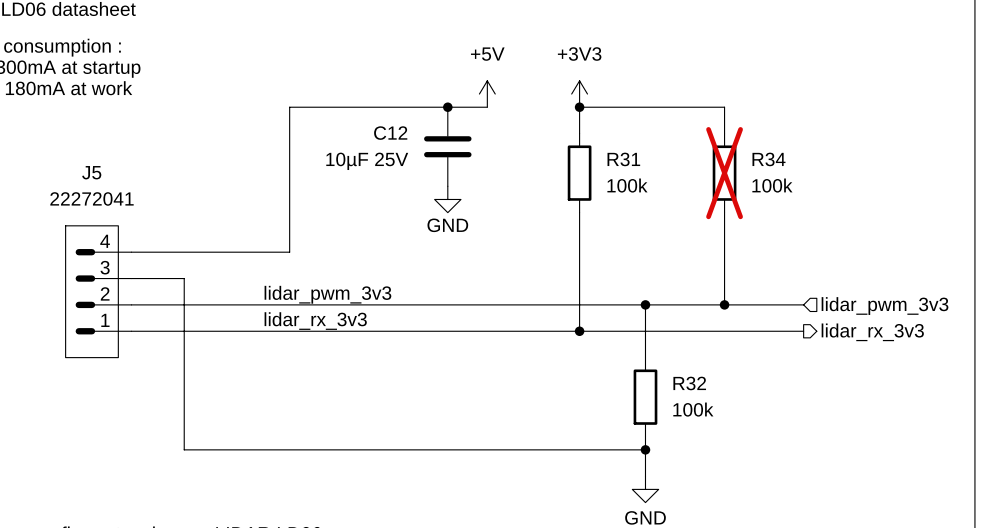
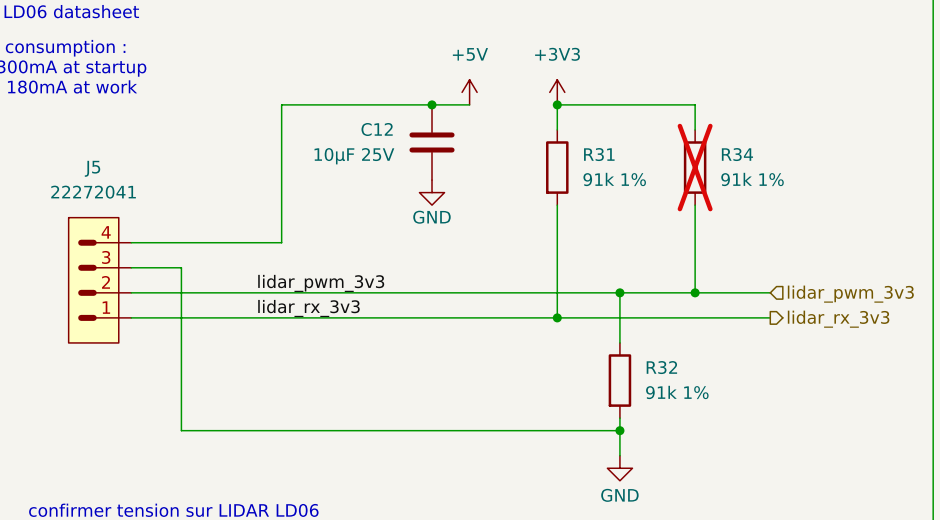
R31 value: 100k (627, 185) -> 91k 1% (614, 179)
R34 value: 100k (772, 185) -> 91k 1% (752, 179)
R32 value: 100k (693, 409) -> 91k 1% (677, 392)

